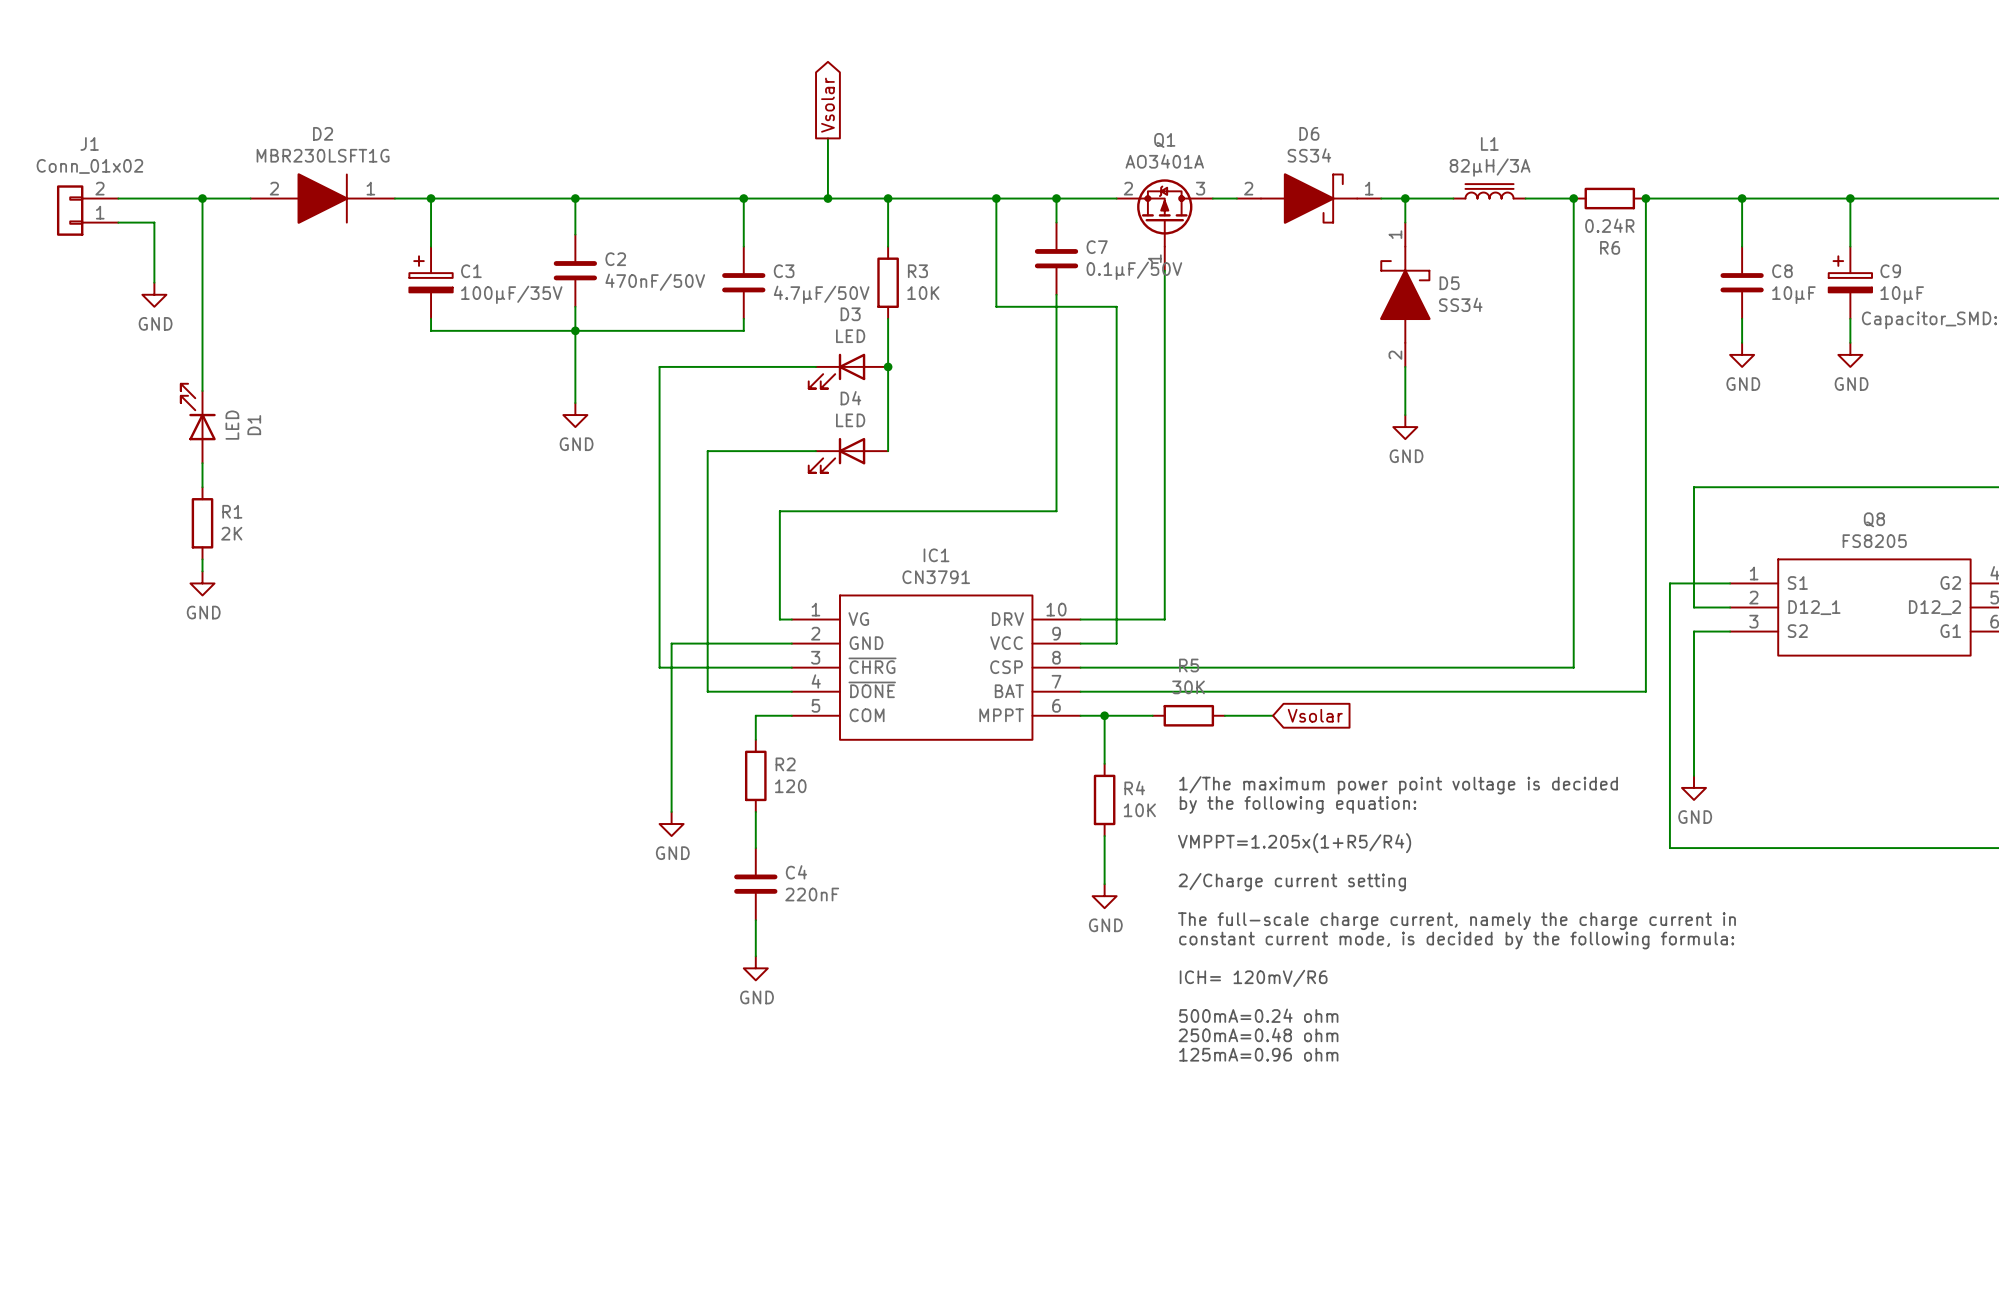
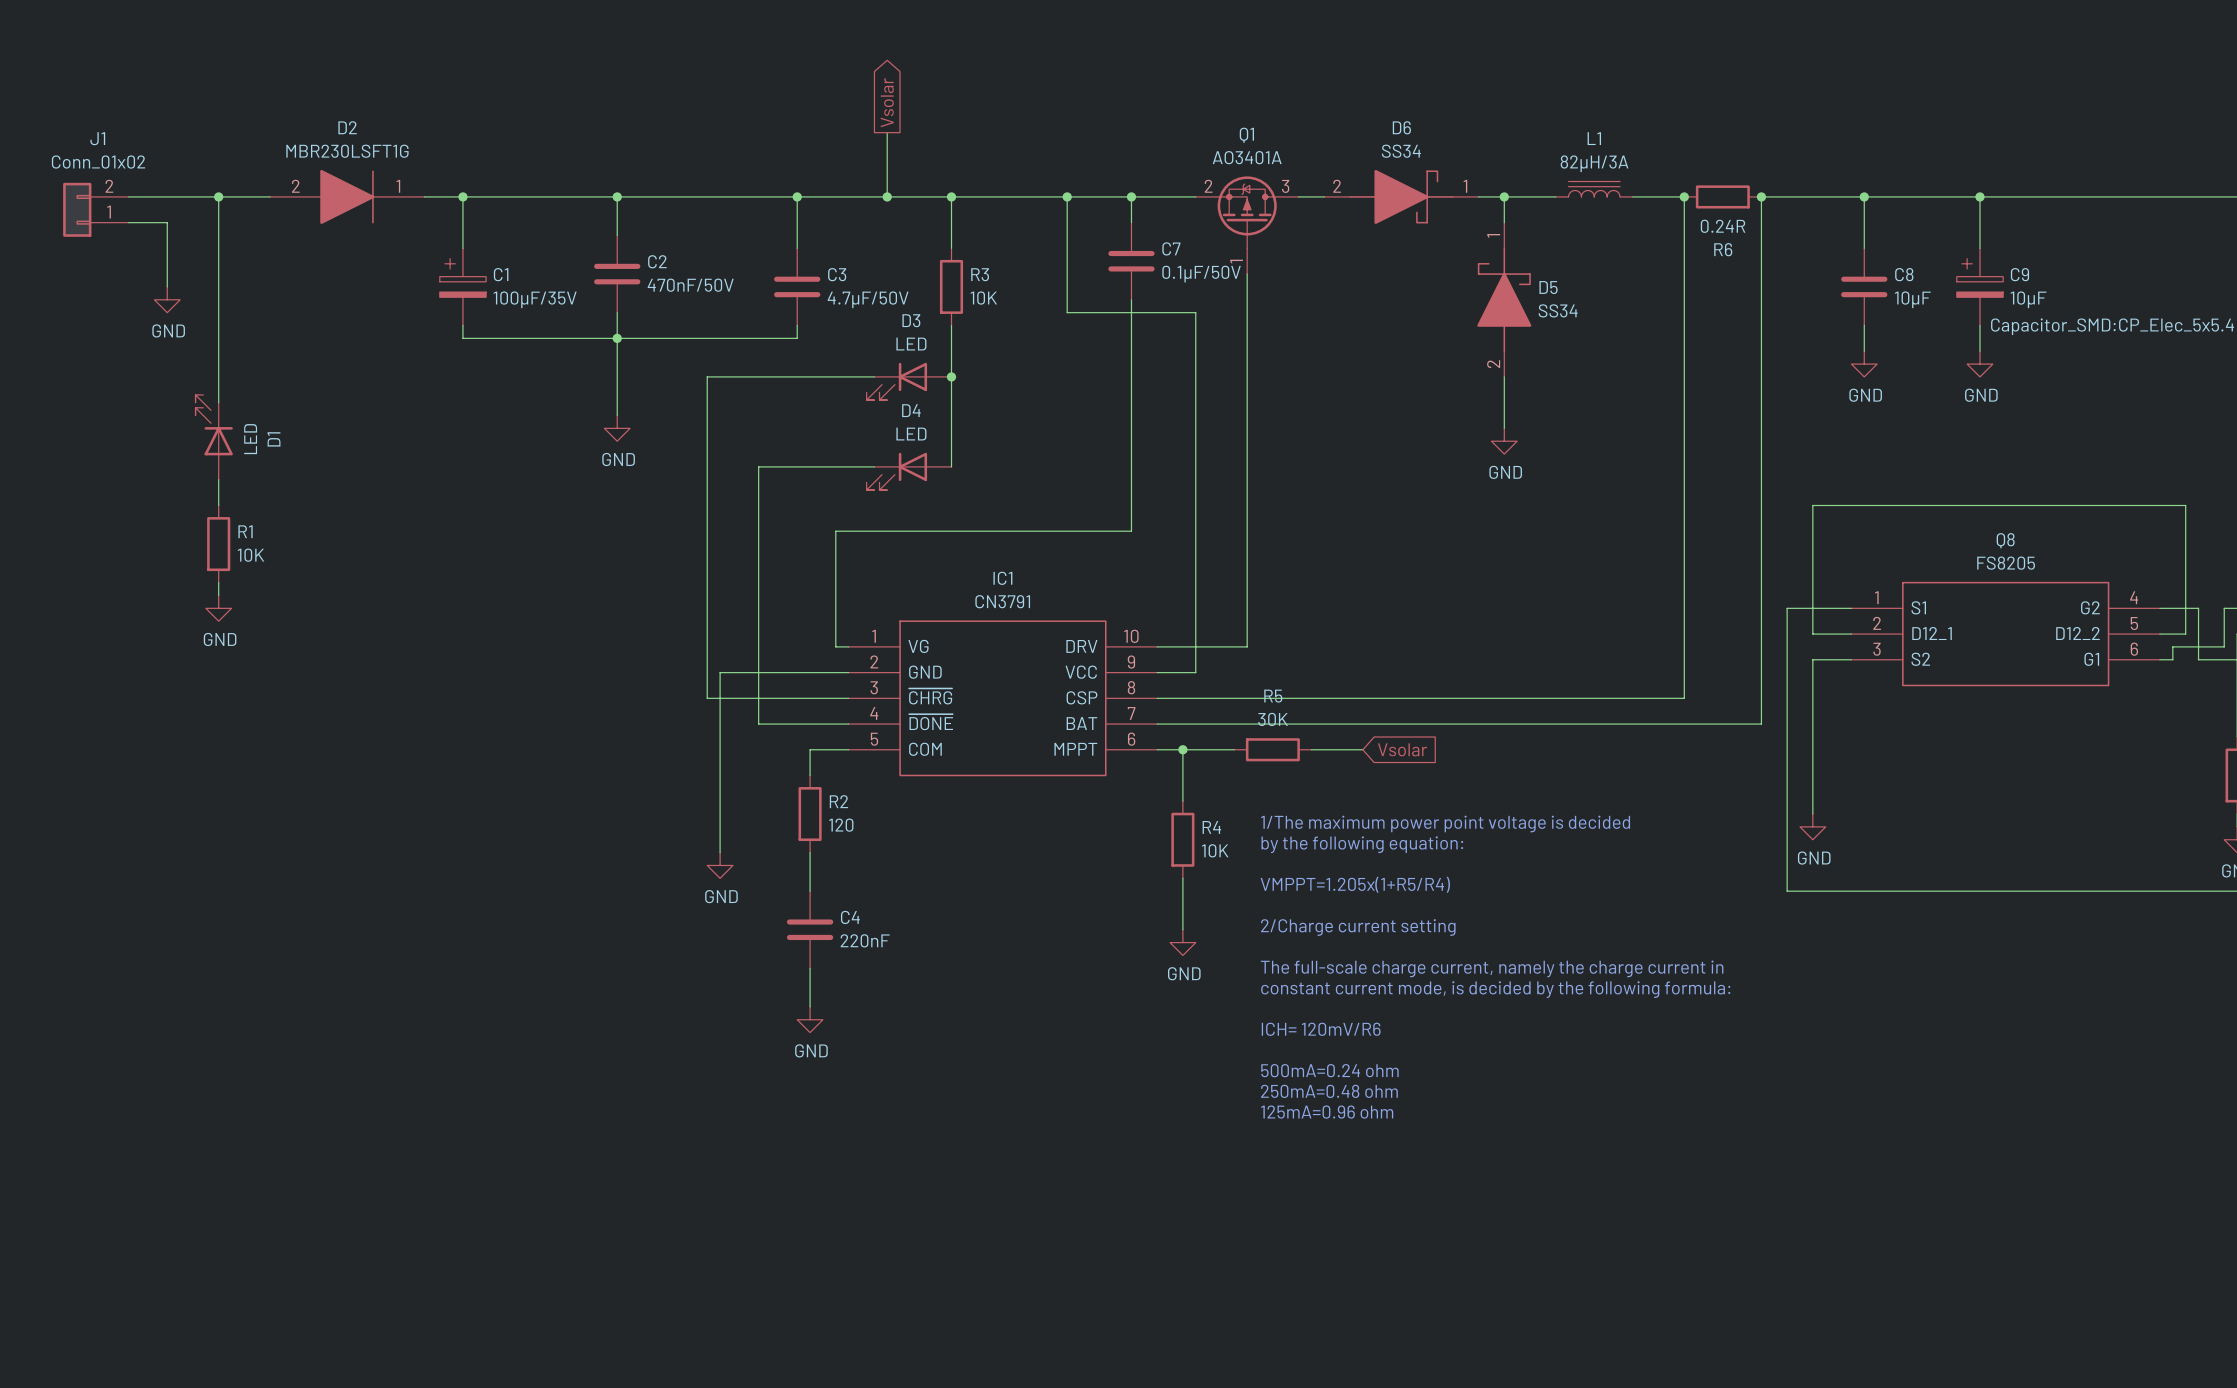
R1 value: 2K (231, 533) -> 10K (250, 555)

